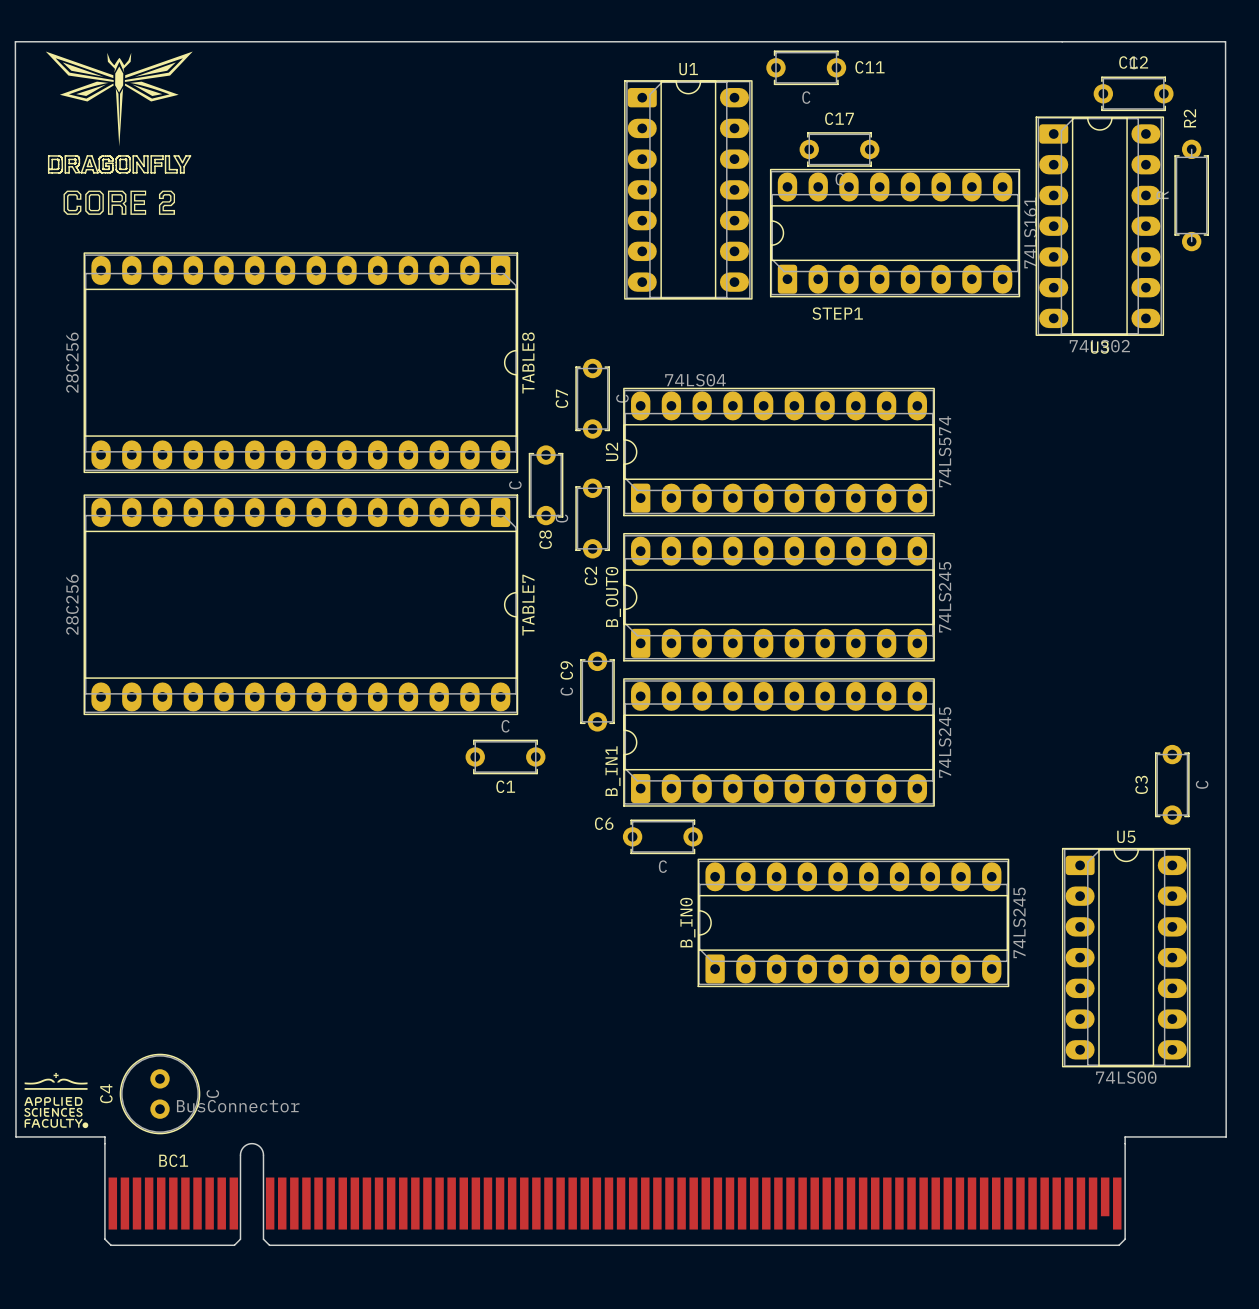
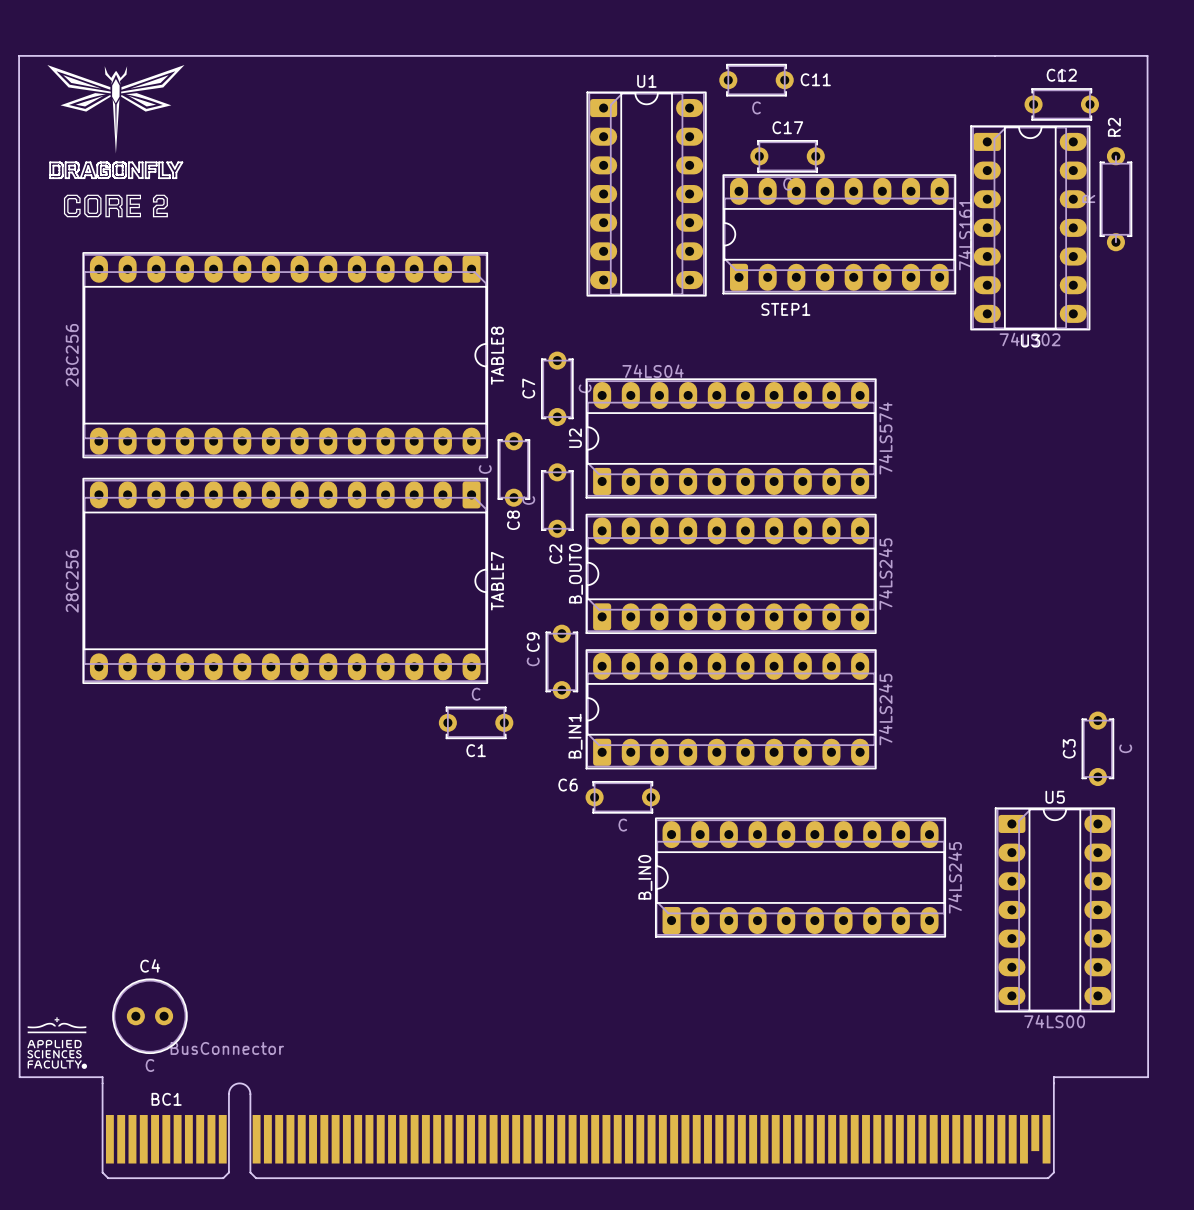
C4 rotation: 0° (160, 1094) -> 90° clockwise (149, 1016)

